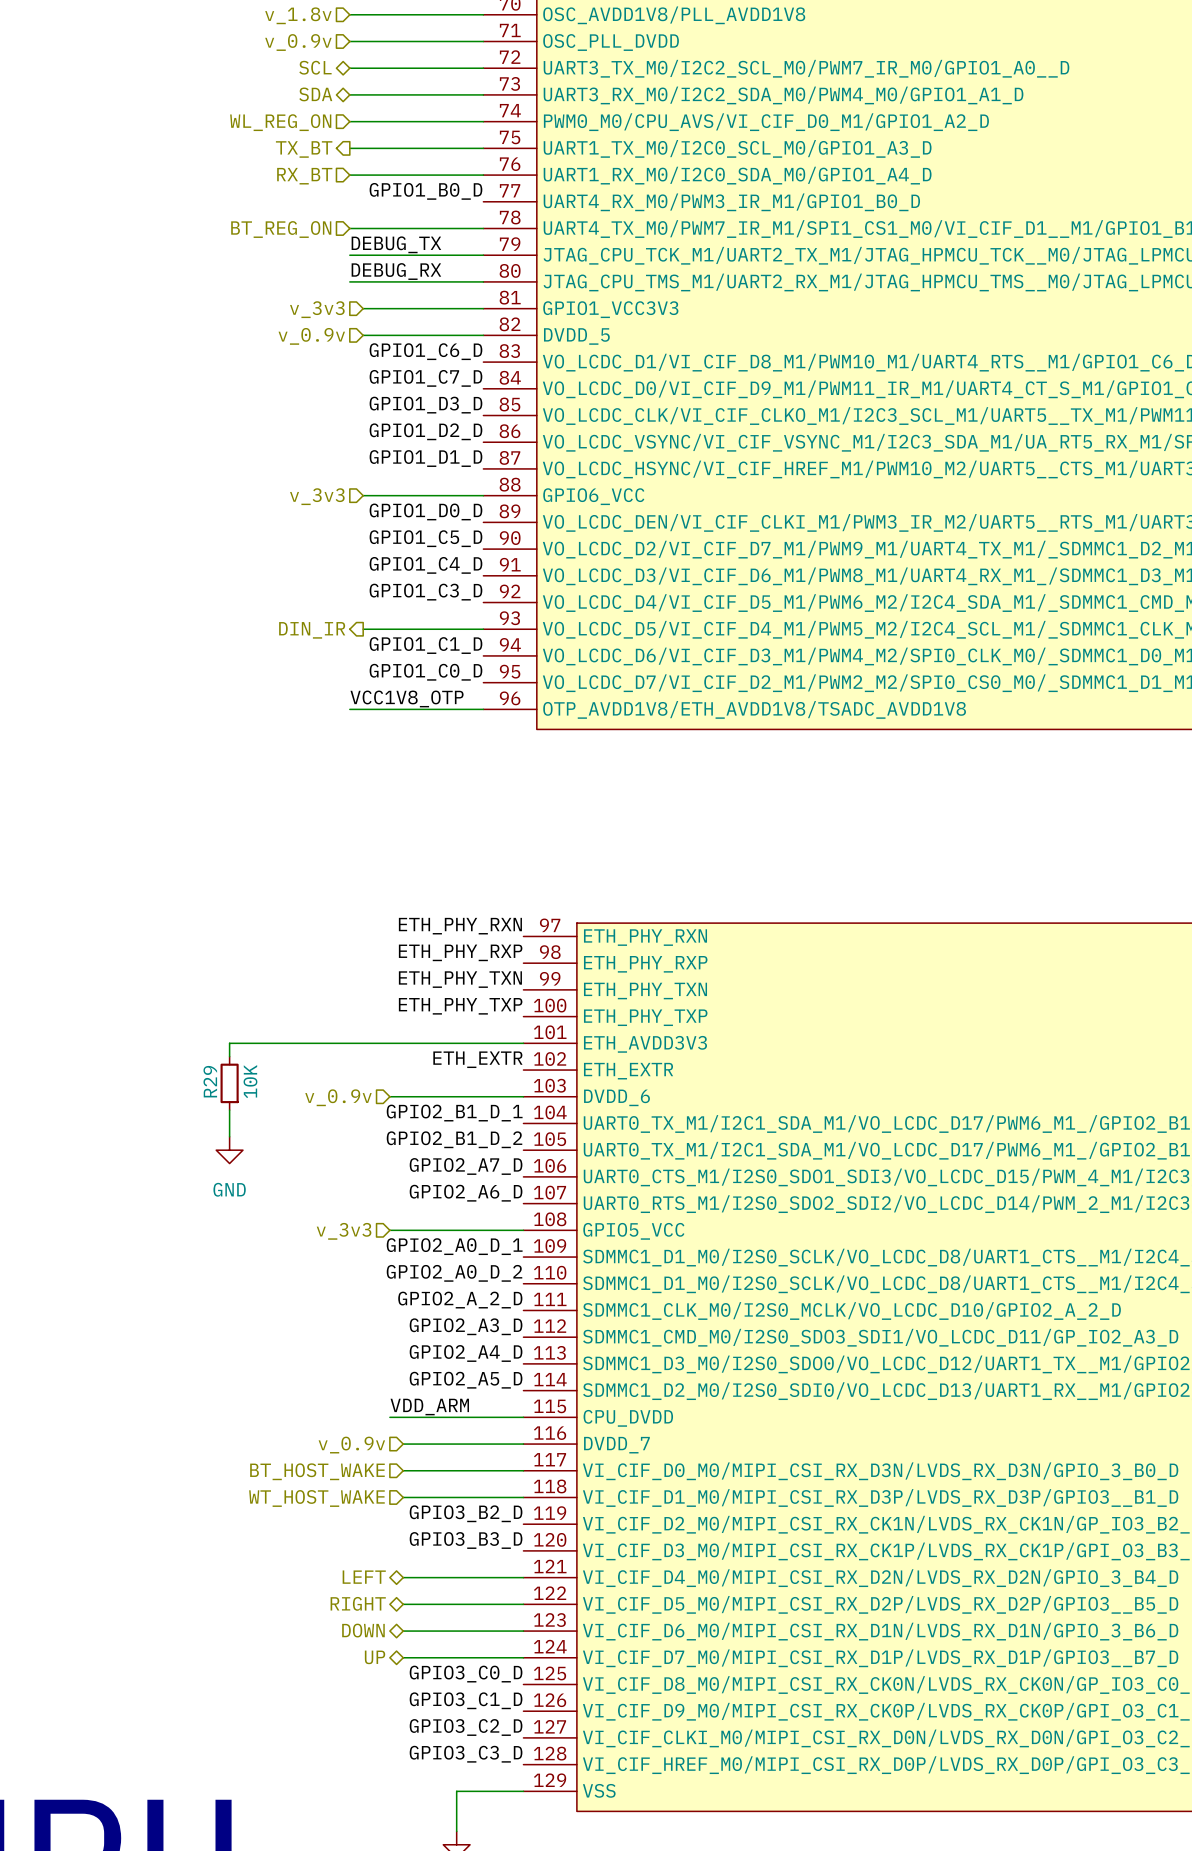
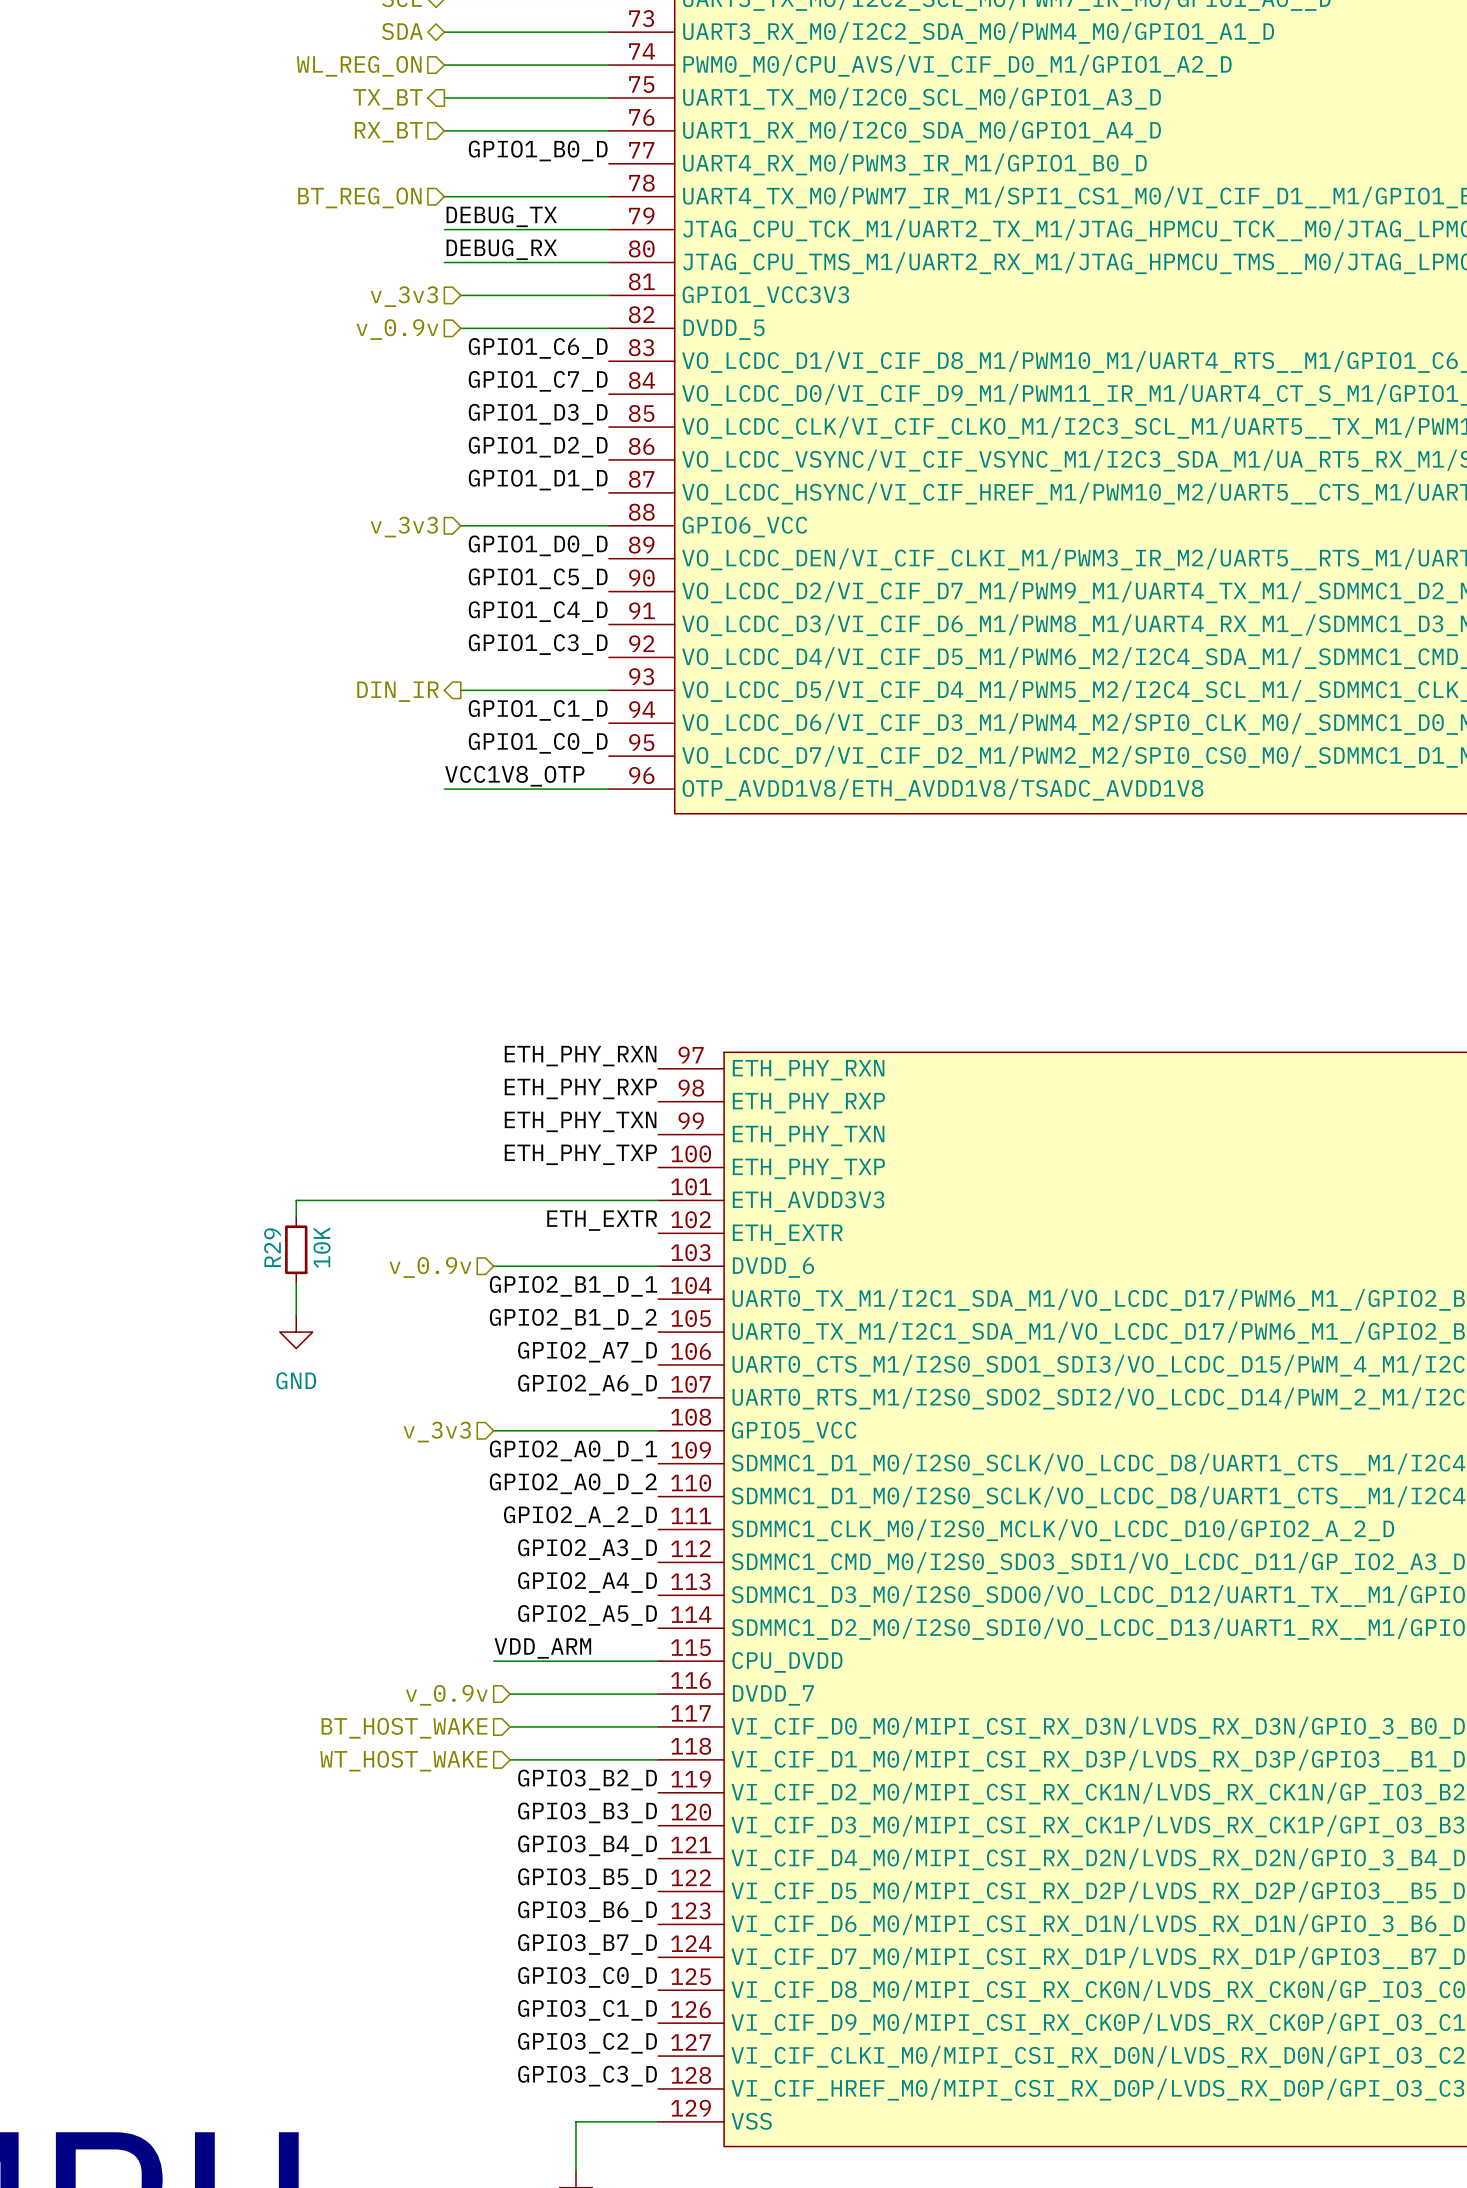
label: none -> GPIO3_B4_D (587, 1845)
hierarchical label: LEFT (364, 1577) -> none
wire: (403, 1577) (523, 1577) -> none
label: none -> GPIO3_B5_D (587, 1878)
hierarchical label: RIGHT (358, 1603) -> none
wire: (403, 1604) (523, 1604) -> none
label: none -> GPIO3_B6_D (587, 1911)
hierarchical label: DOWN (363, 1630) -> none
wire: (403, 1631) (523, 1631) -> none
label: none -> GPIO3_B7_D (587, 1944)
hierarchical label: UP (375, 1657) -> none
wire: (403, 1657) (523, 1657) -> none

